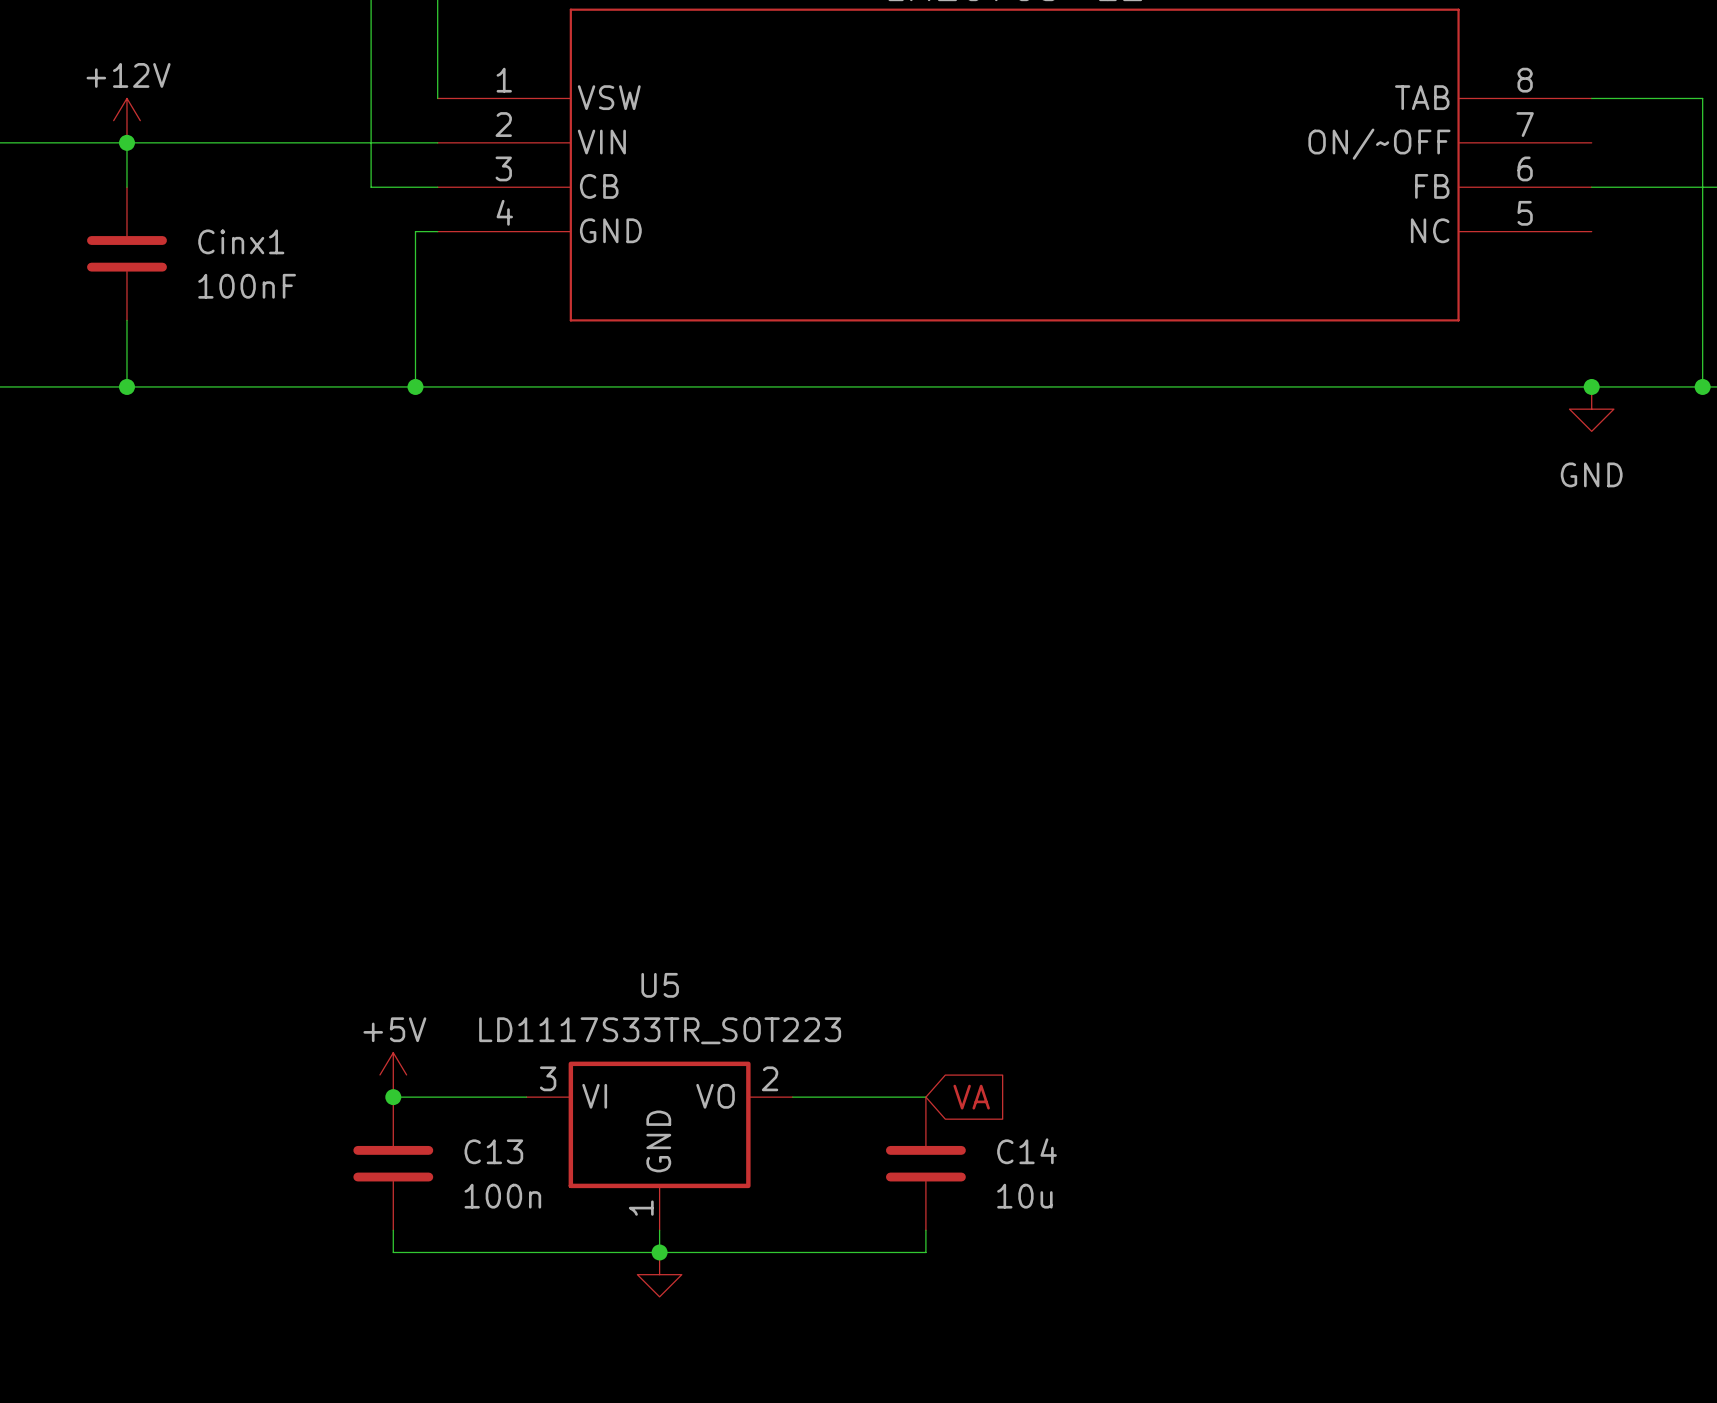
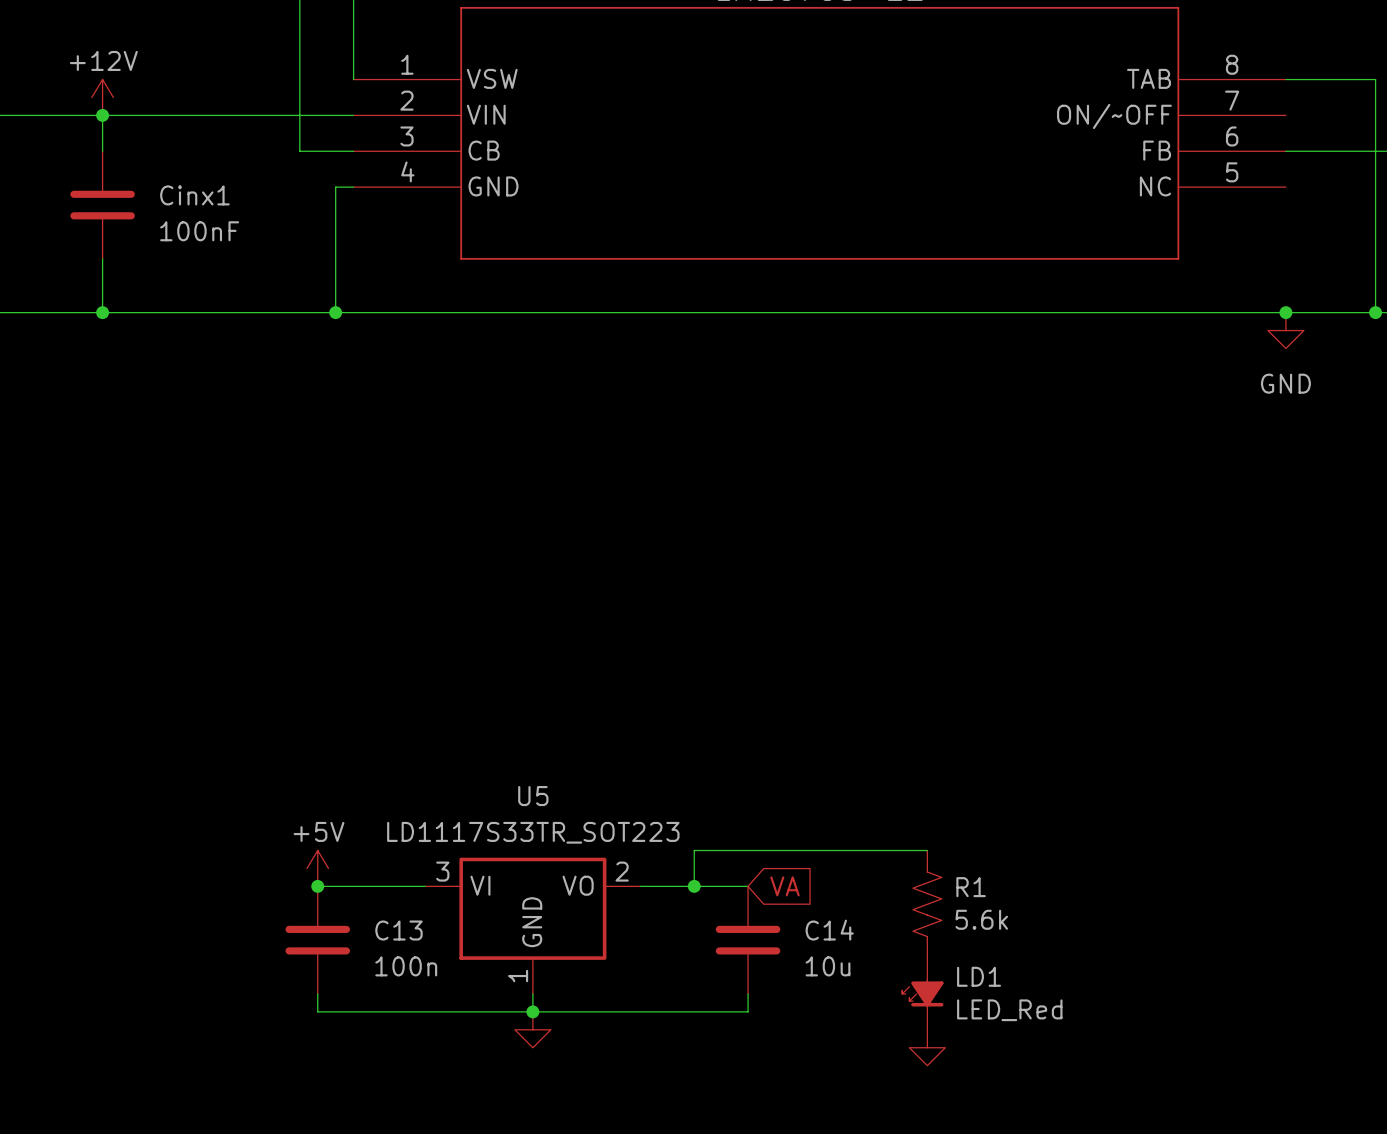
wire: none -> (927, 850) (694, 850) (694, 886)
junction: none -> (694, 886)
R1: none -> 5.6k (927, 904)
LD1: none -> LED_Red (922, 993)
power symbol: none -> (927, 1047)

